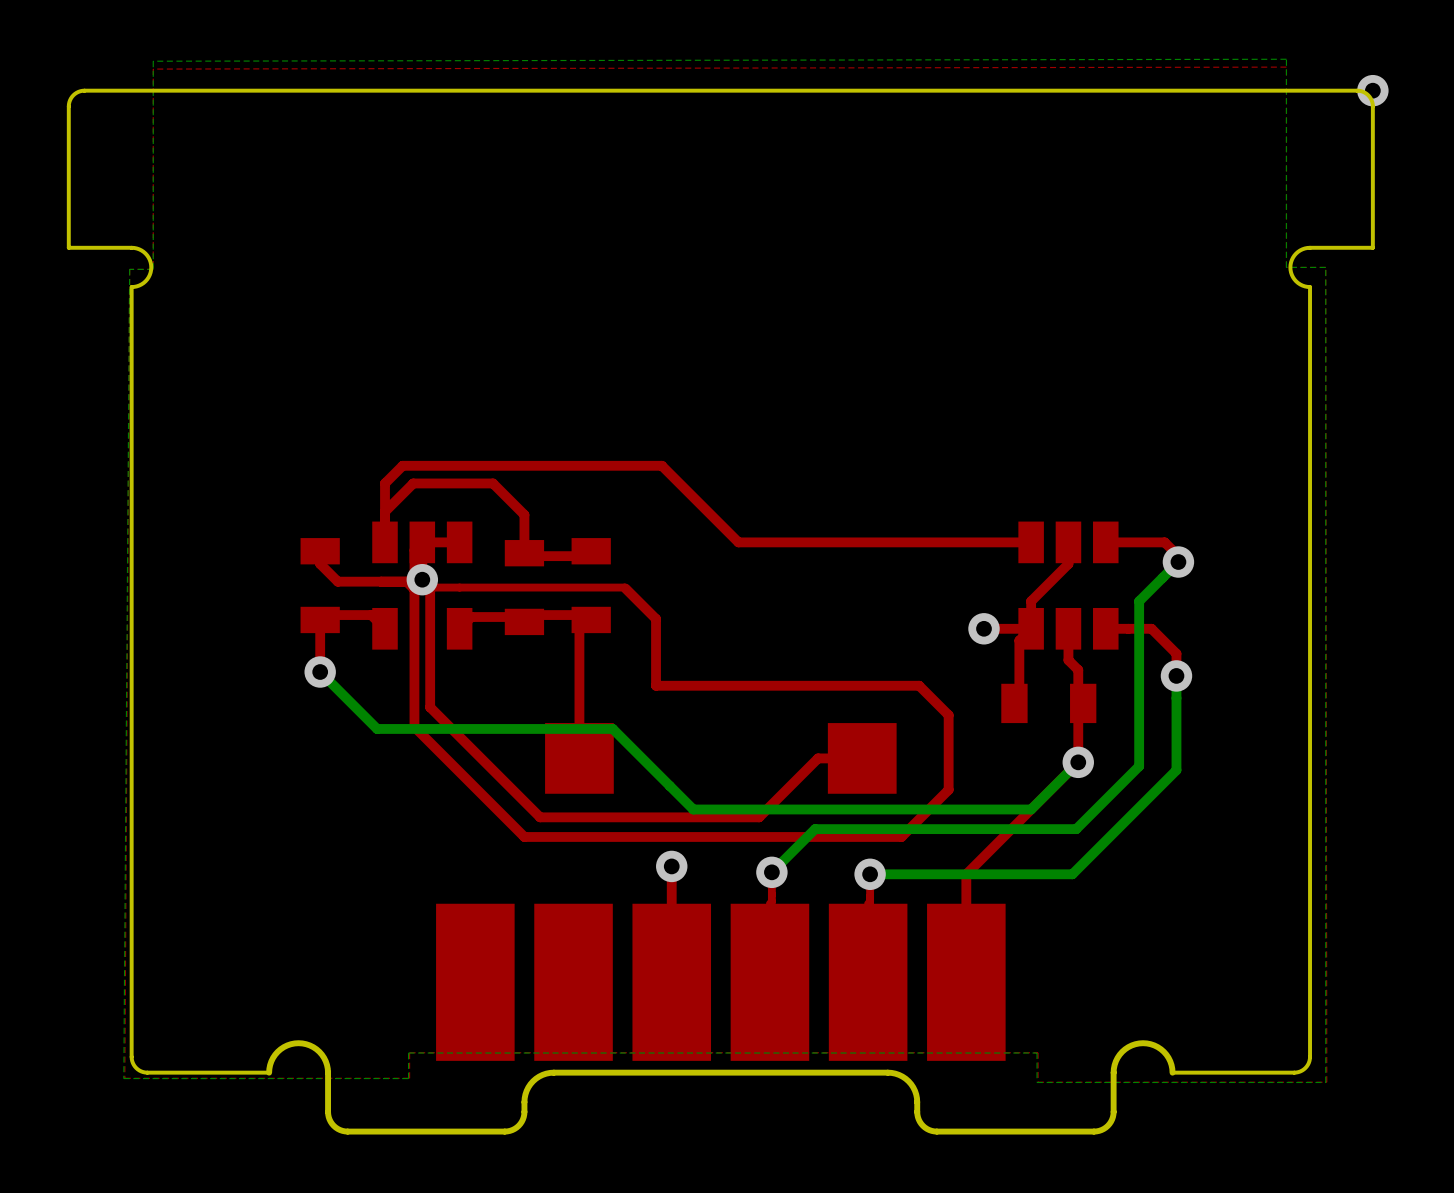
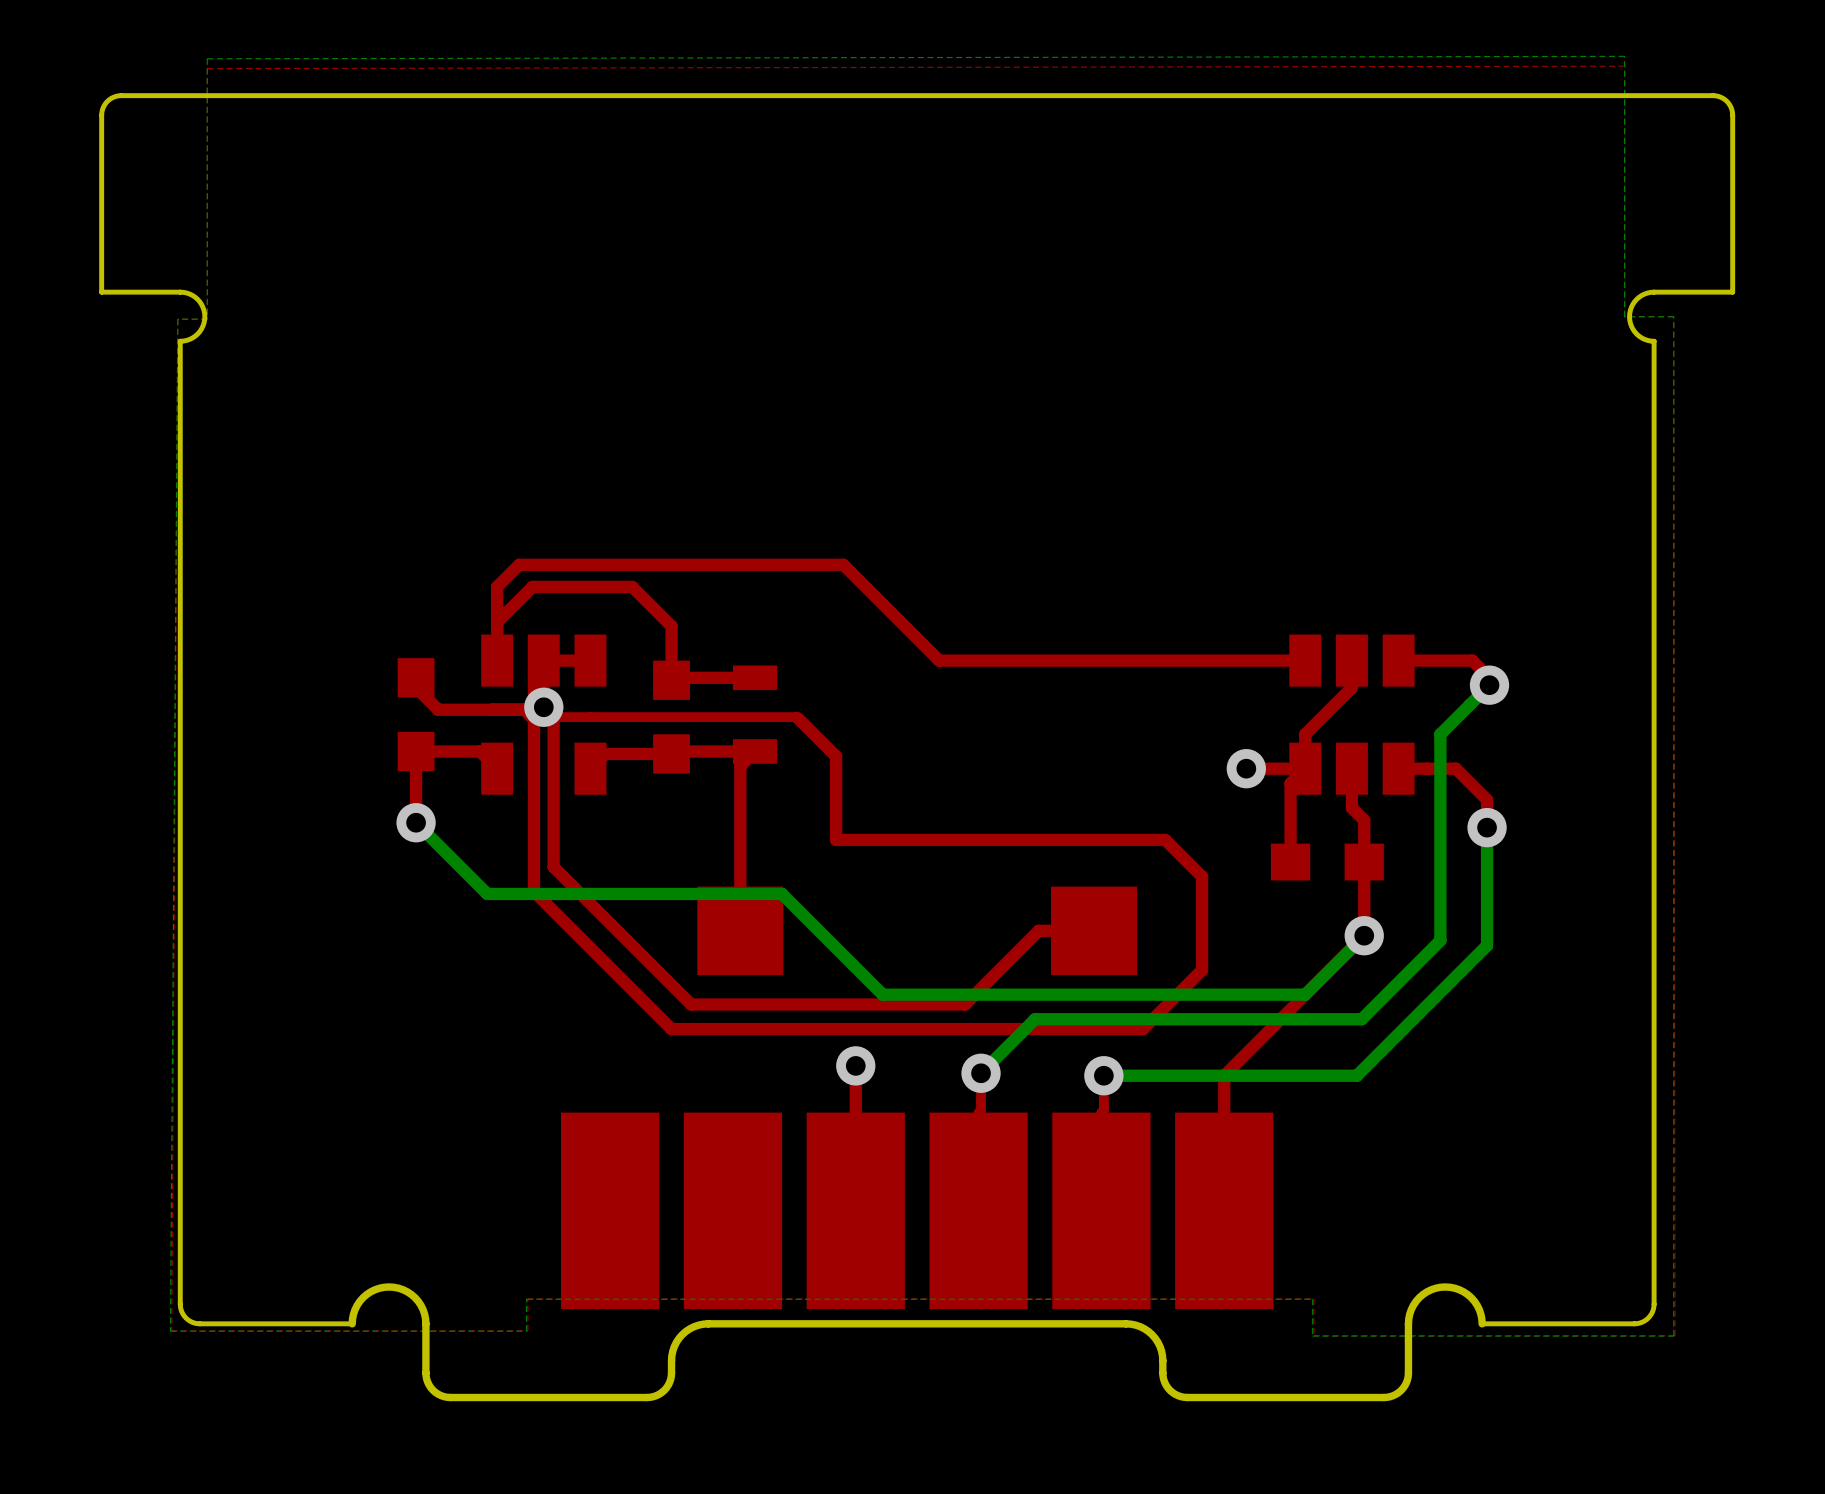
via: (1372, 90) -> none
part footprint: [300, 538, 340, 634] -> [397, 658, 435, 772]
part footprint: [571, 538, 611, 634] -> [732, 665, 778, 764]
part footprint: [504, 540, 545, 636] -> [653, 660, 690, 774]
part footprint: [1001, 683, 1097, 724] -> [1270, 843, 1384, 881]

